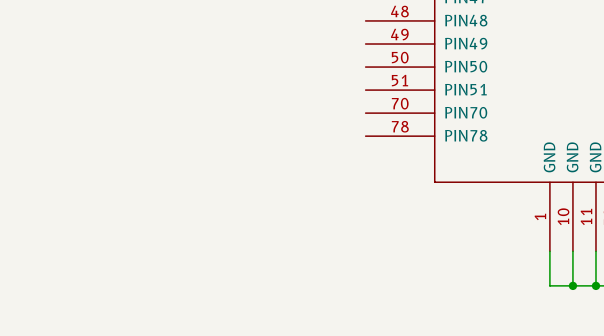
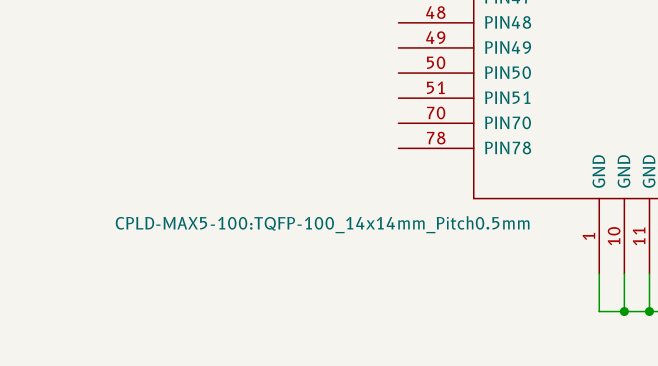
part text: none -> CPLD-MAX5-100:TQFP-100_14x14mm_Pitch0.5mm (322, 224)

